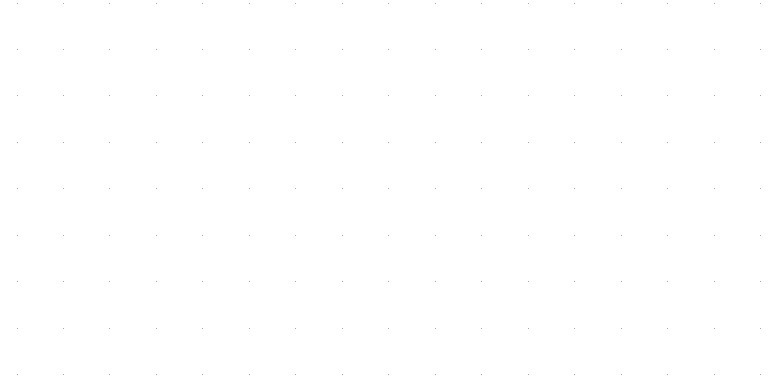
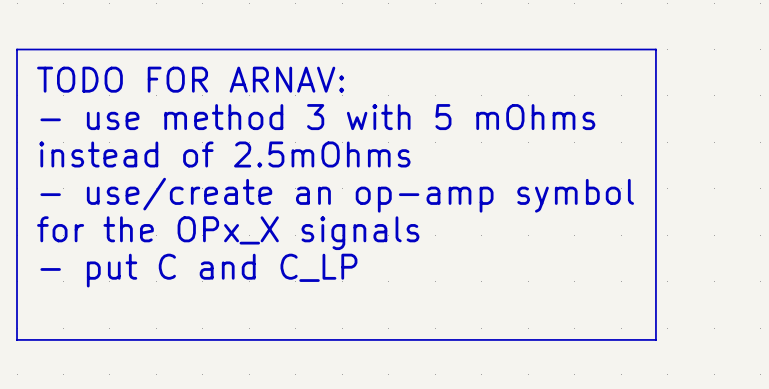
line: none -> (17, 49) (655, 49) (655, 339) (17, 339) (17, 49)
text: none -> TODO FOR ARNAV: (190, 79)
text: none -> - use method 3 with 5 mOhms (317, 117)
text: none -> instead of 2.5mOhms (224, 154)
text: none -> - use/create an op-amp symbol (337, 195)
text: none -> for the OPx_X signals (228, 233)
text: none -> - put C and C_LP (198, 270)

